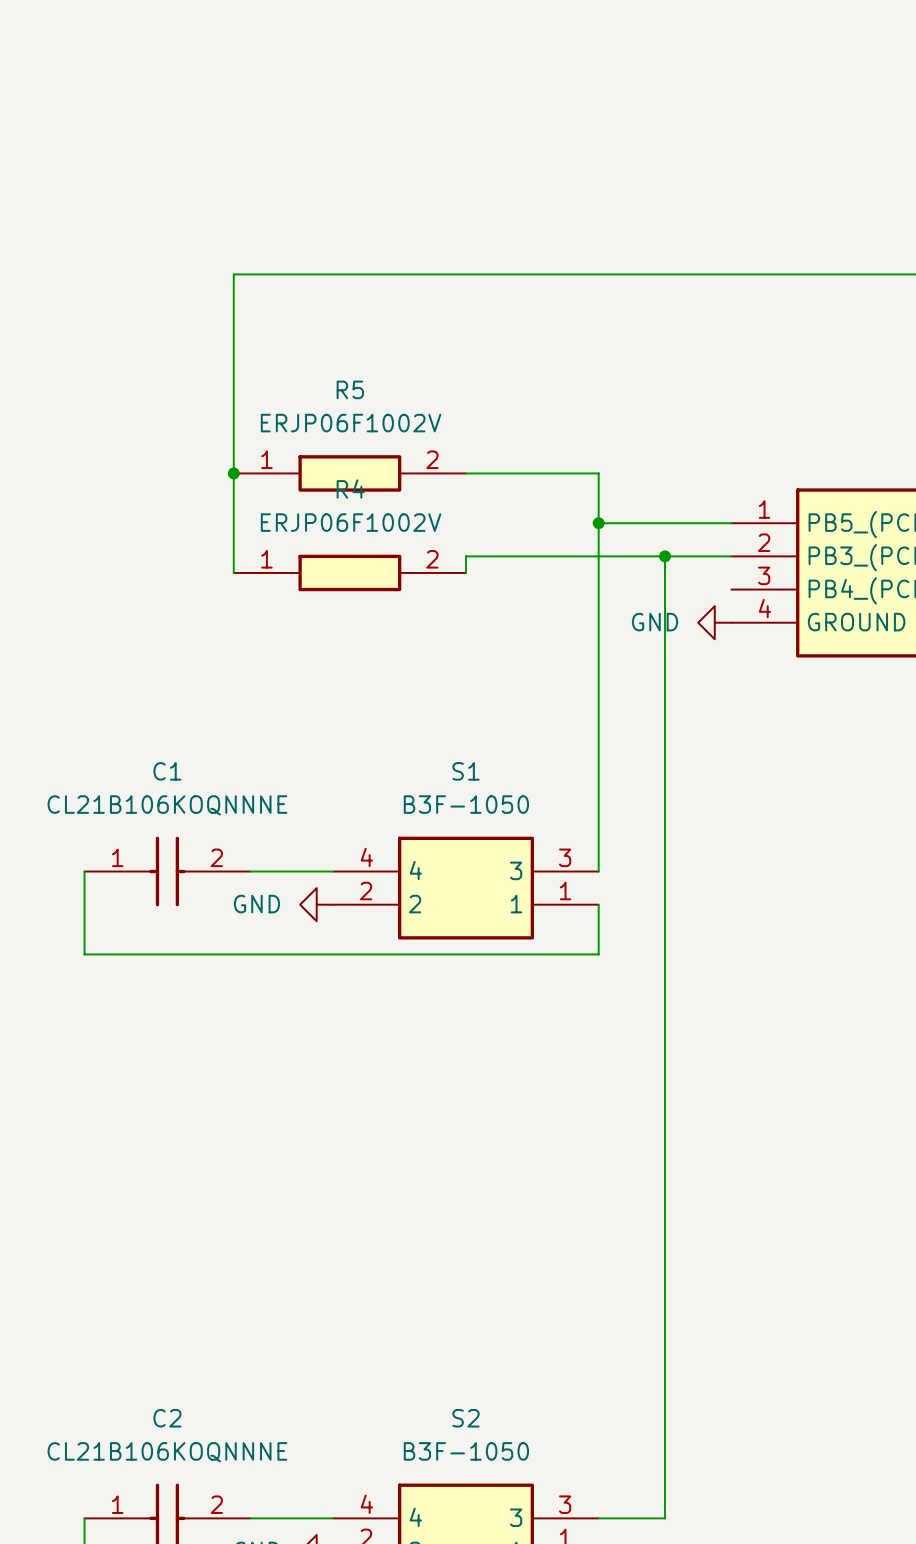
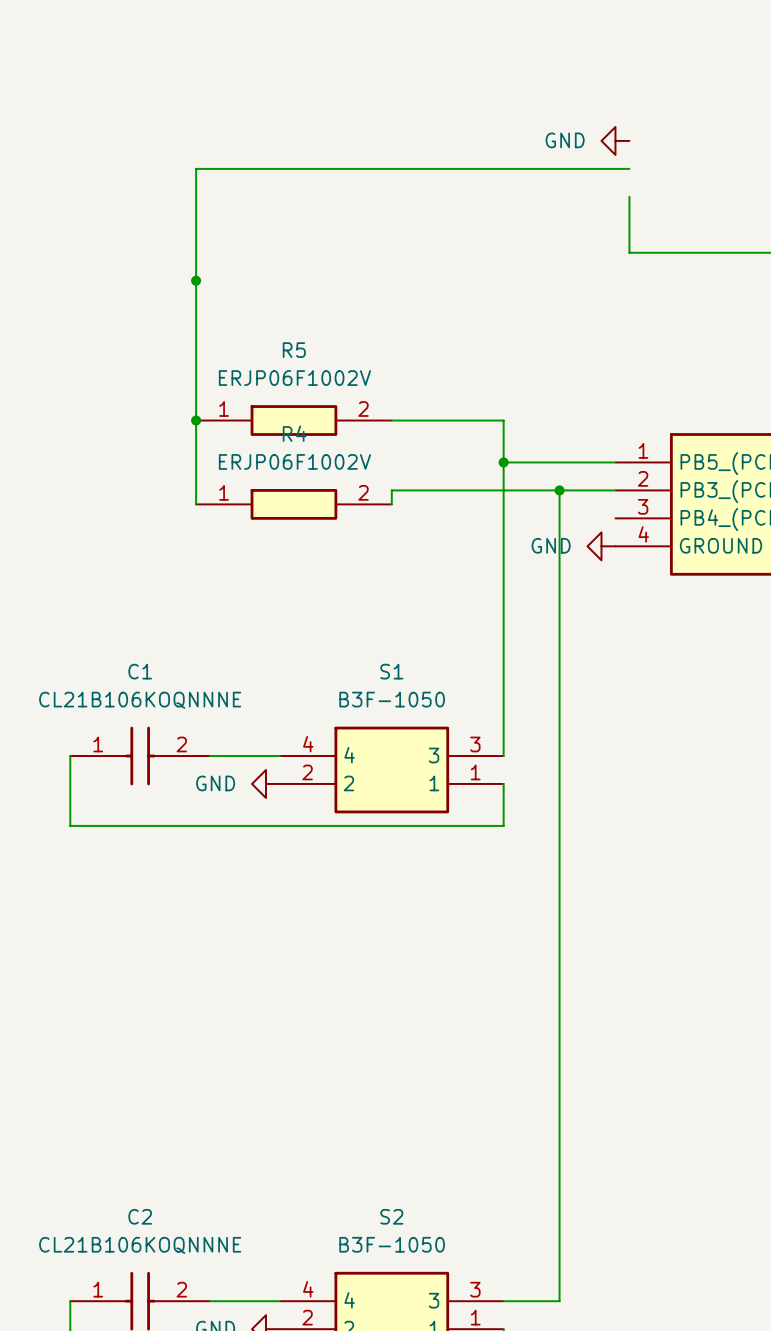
power symbol: none -> GND (615, 140)
wire: none -> (629, 196) (629, 252)
wire: (233, 274) (747, 274) -> (196, 252) (196, 168) (629, 168)
junction: none -> (196, 280)

